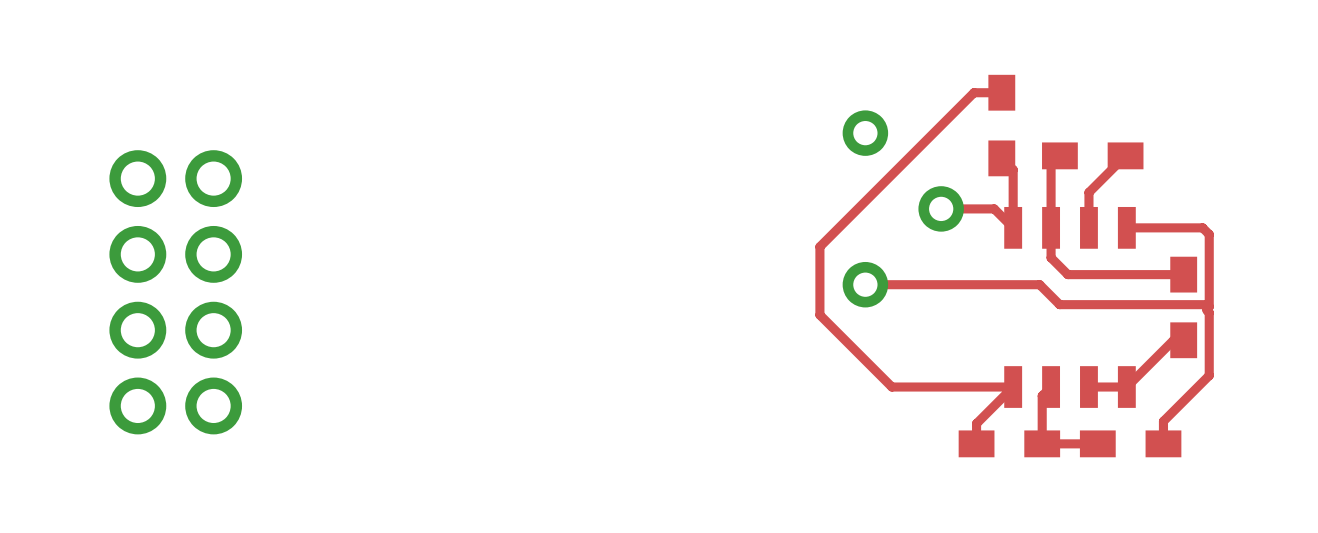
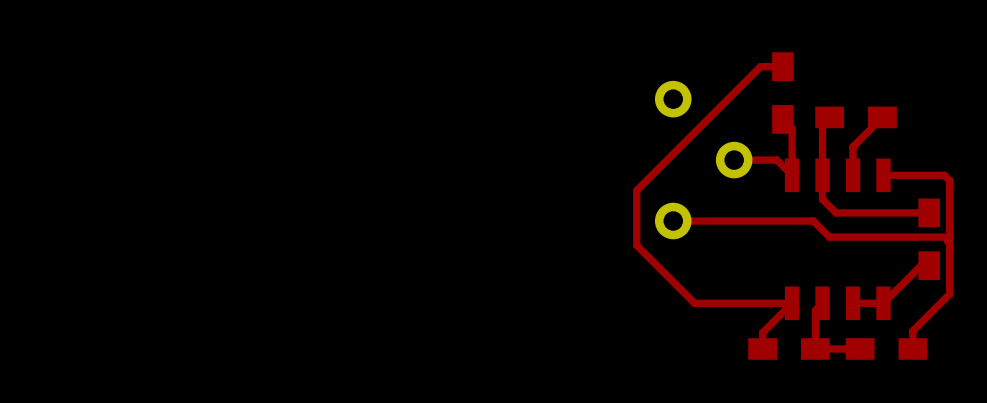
part: (175, 292) -> none

